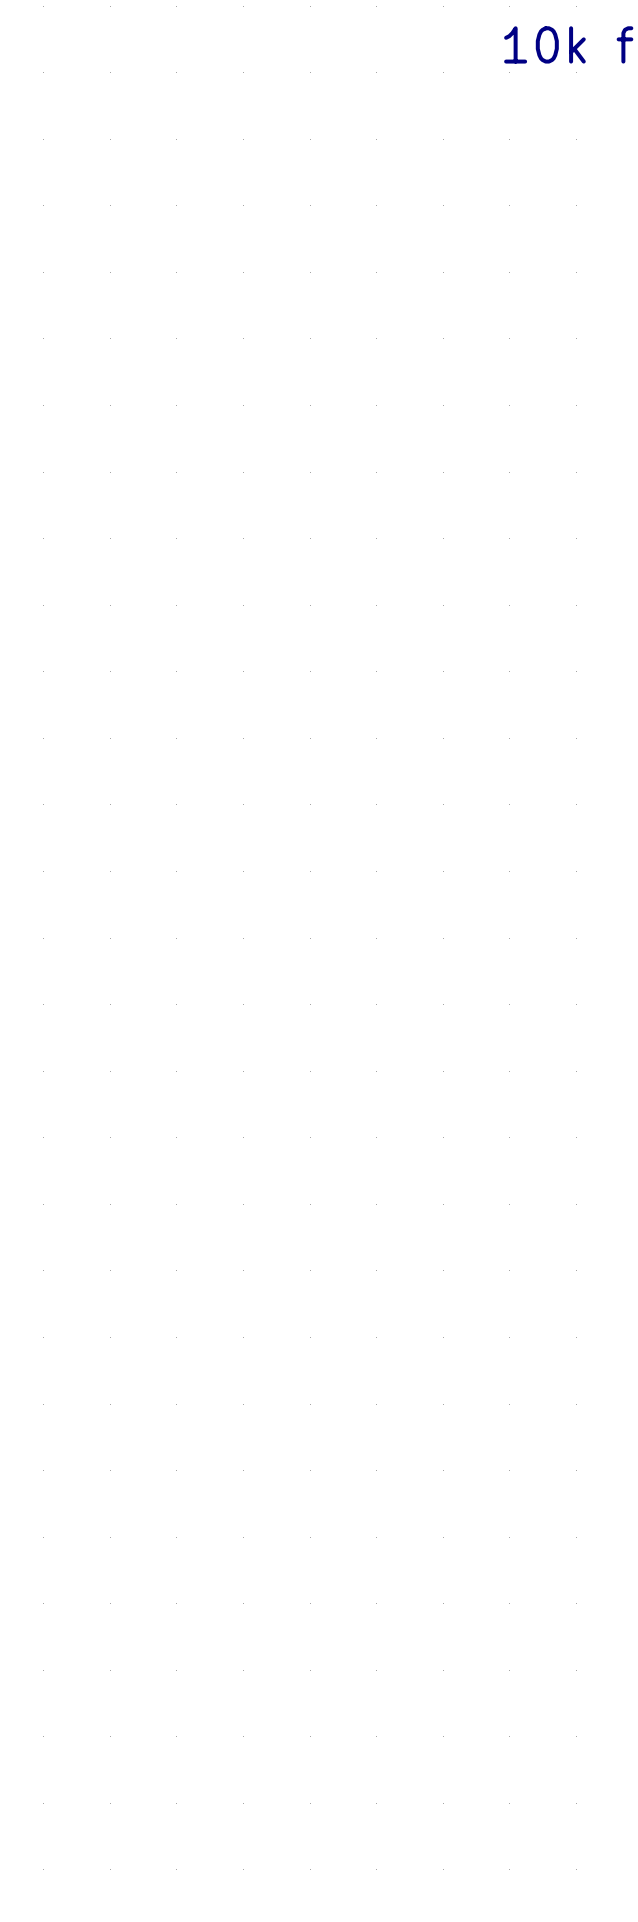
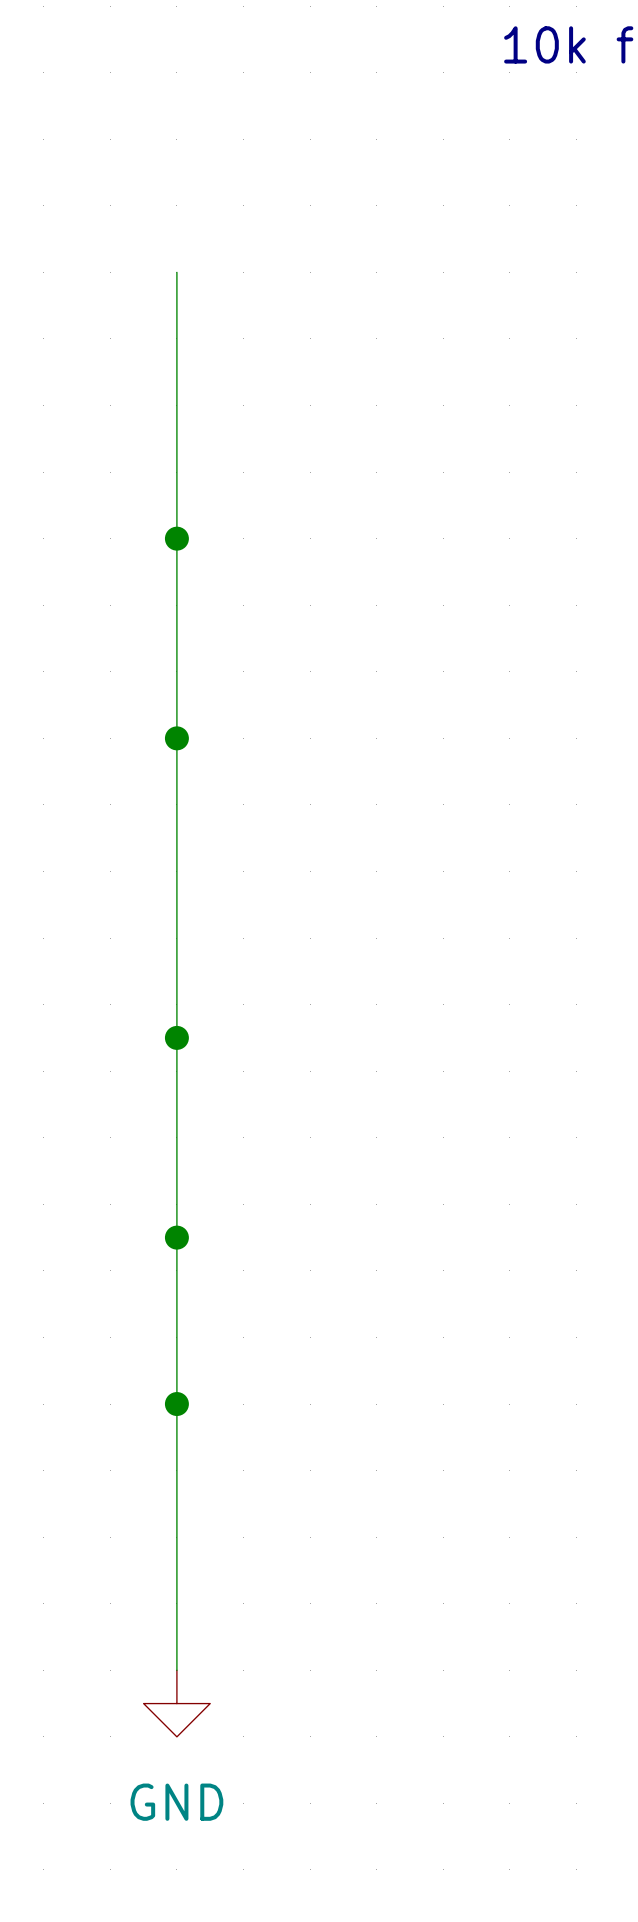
wire: none -> (176, 272) (176, 1670)
junction: none -> (176, 538)
junction: none -> (176, 738)
junction: none -> (176, 1037)
junction: none -> (176, 1237)
junction: none -> (176, 1404)
power symbol: none -> GND (176, 1703)

